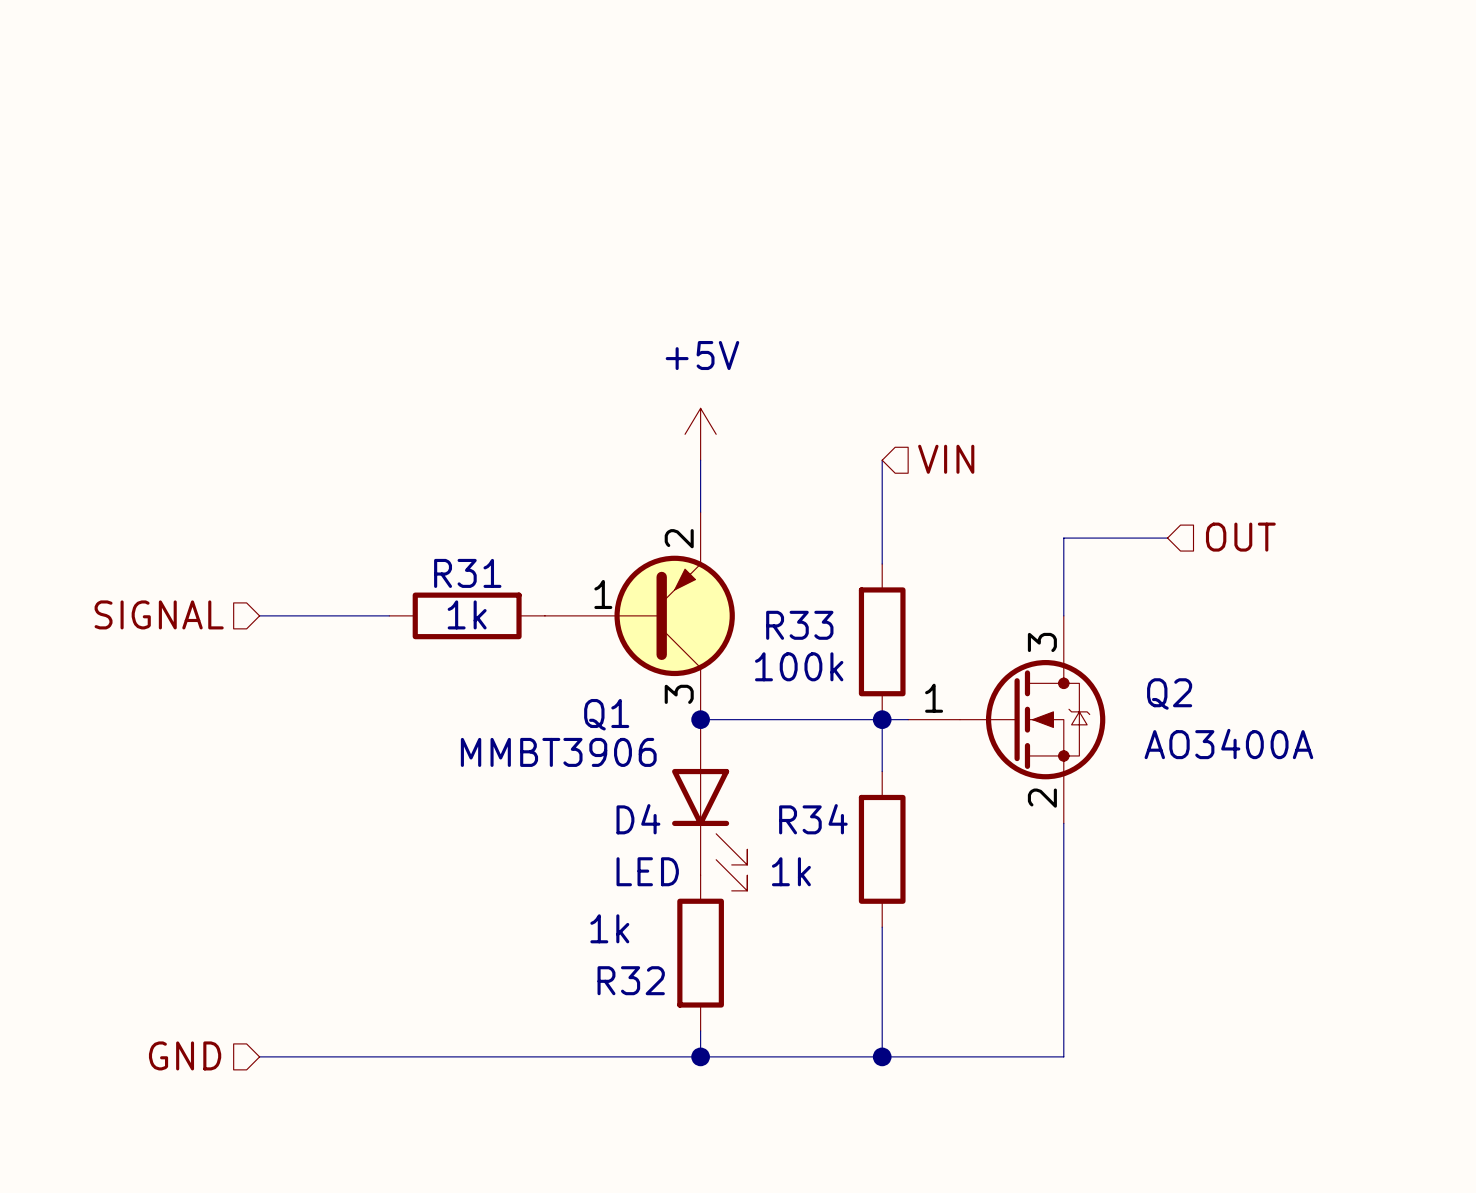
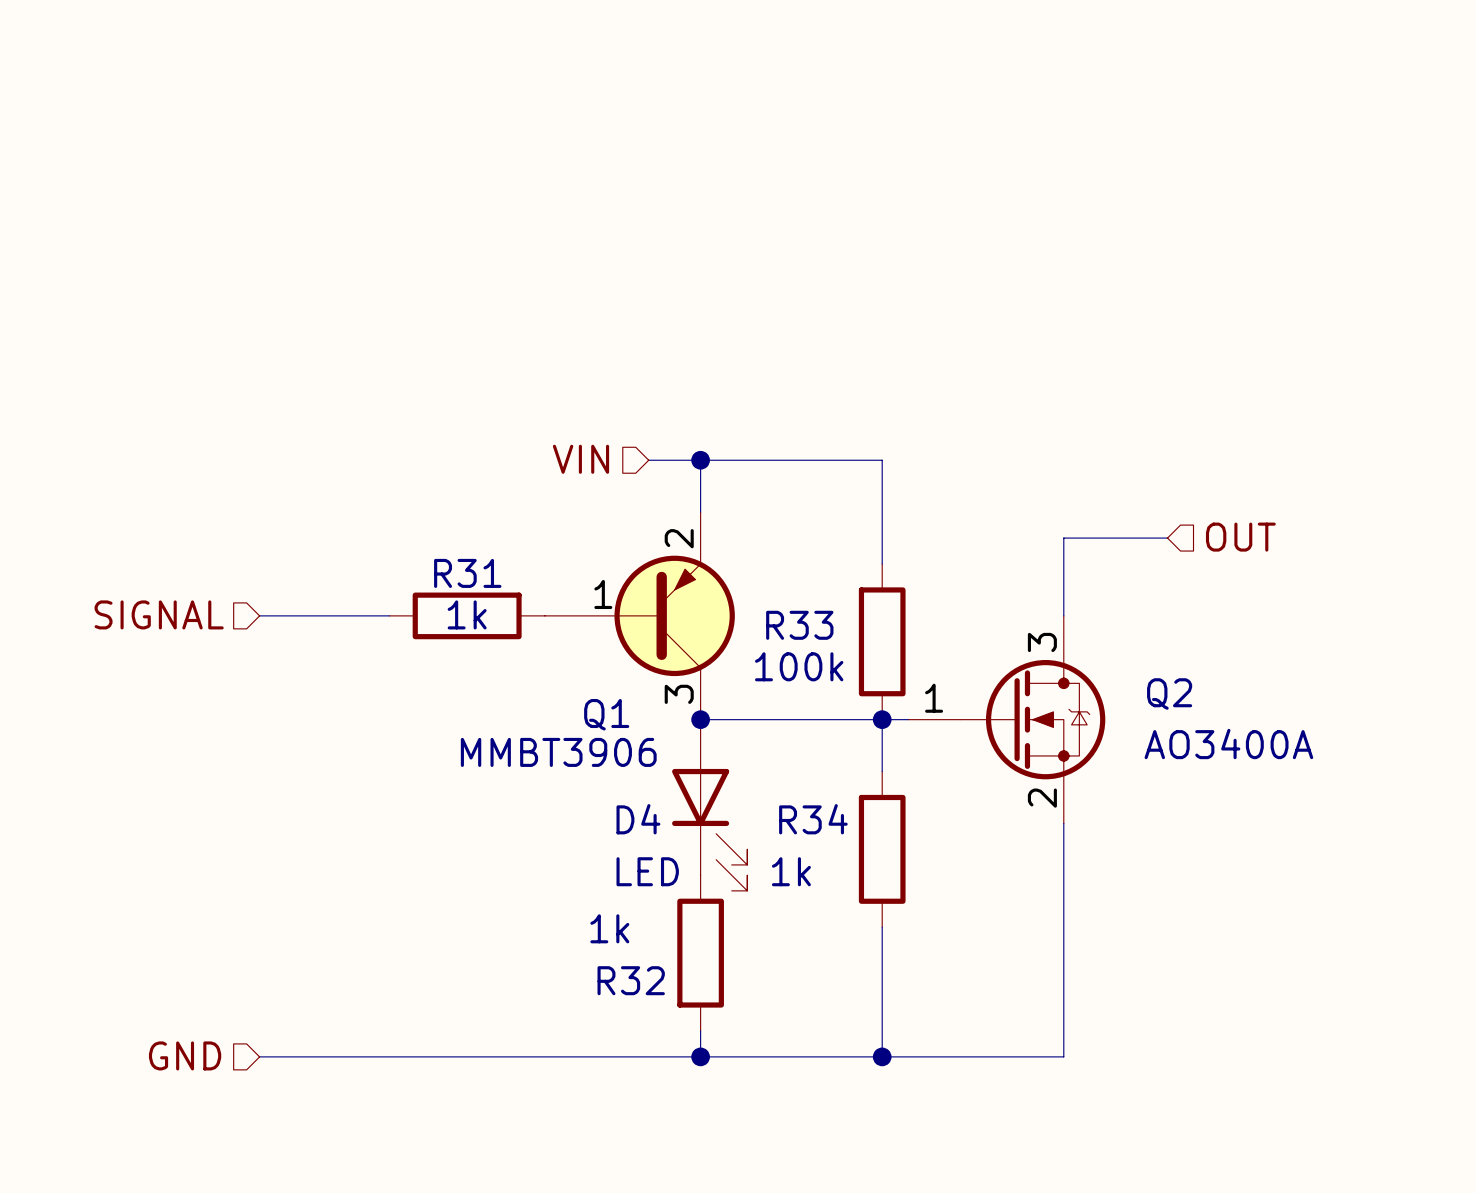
power symbol: +5V (700, 434) -> none
hierarchical label rotation: 0° (946, 459) -> 180° (581, 459)
hierarchical label position: VIN (946, 459) -> VIN (581, 459)
wire: none -> (648, 460) (882, 460)
junction: none -> (700, 460)

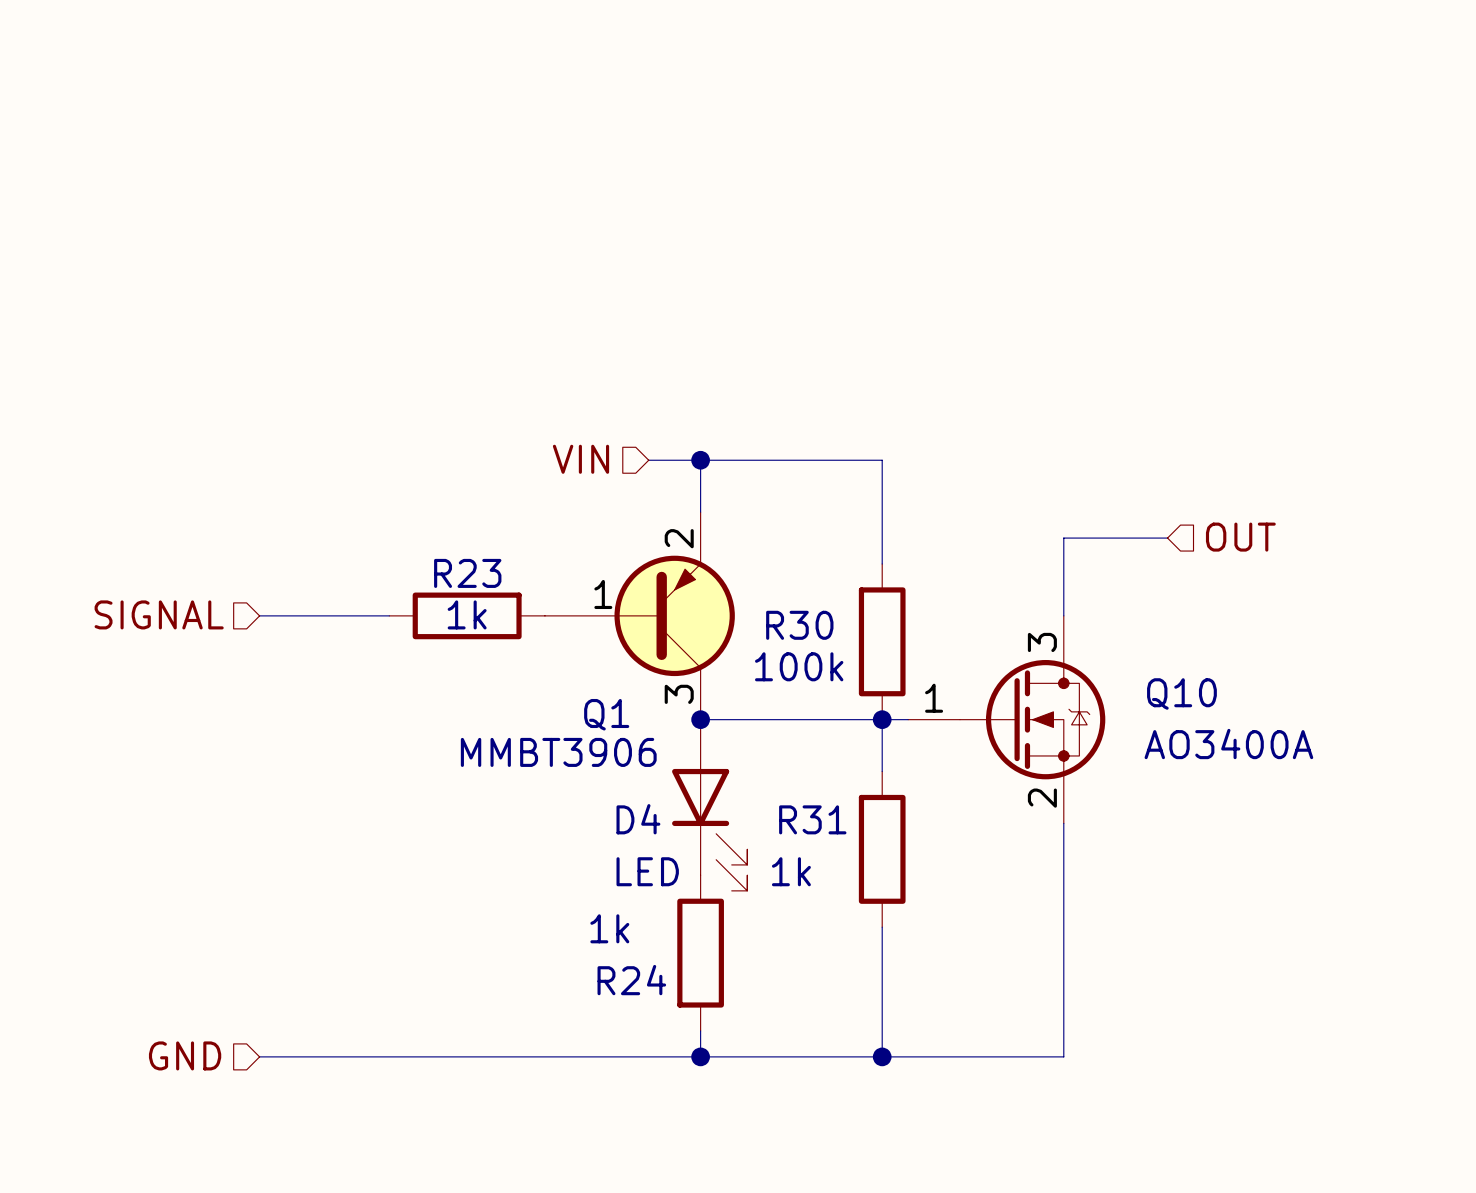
R31 name: R31 (467, 573) -> R23 (467, 573)
R33 name: R33 (799, 625) -> R30 (799, 625)
Q2 name: Q2 (1169, 693) -> Q10 (1181, 693)
R34 name: R34 (813, 819) -> R31 (812, 819)
R32 name: R32 (631, 980) -> R24 (631, 980)

